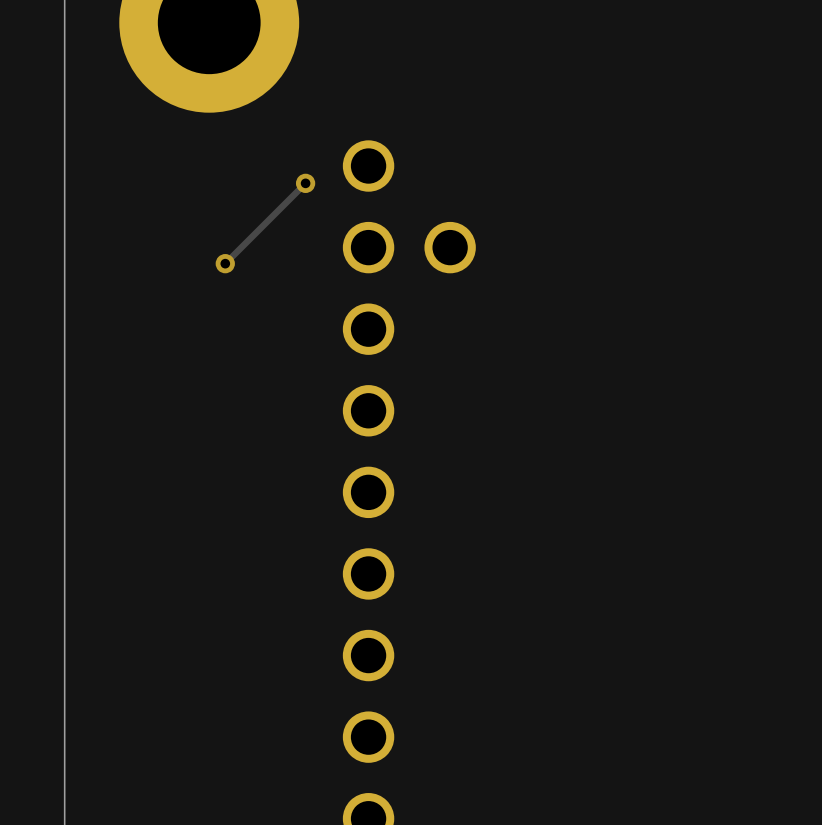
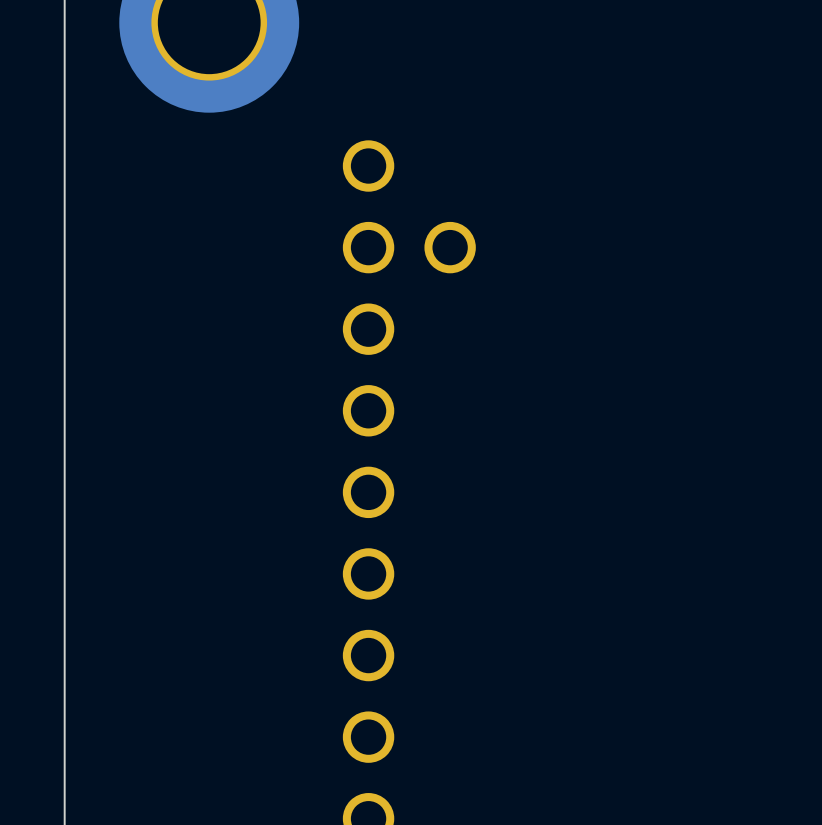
track: (305, 183) (225, 263) -> none
via: (305, 183) -> none
via: (225, 263) -> none

